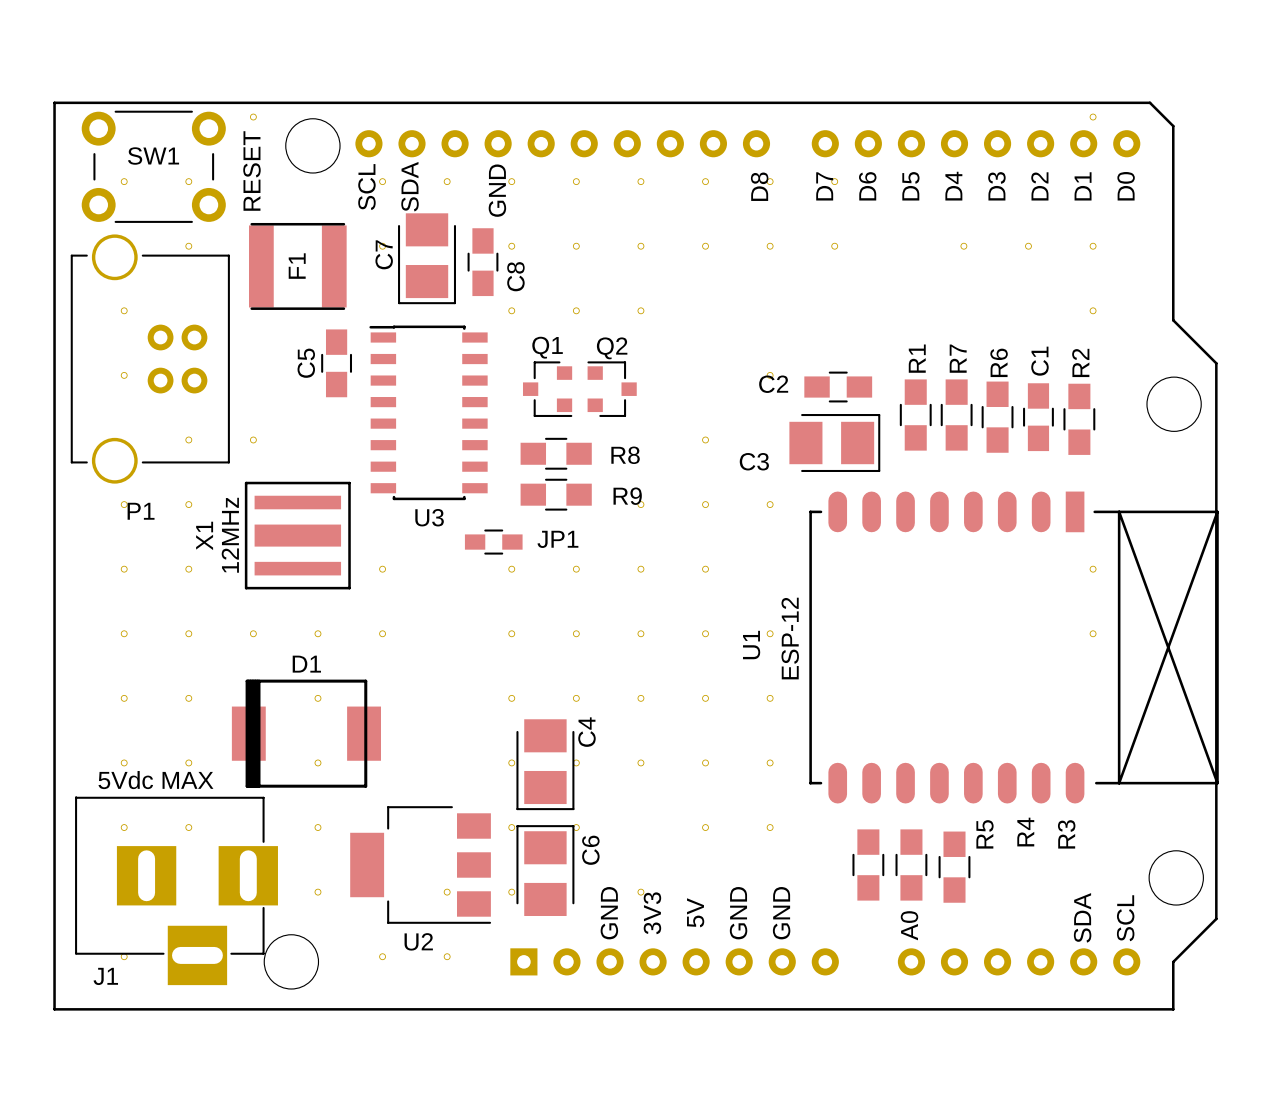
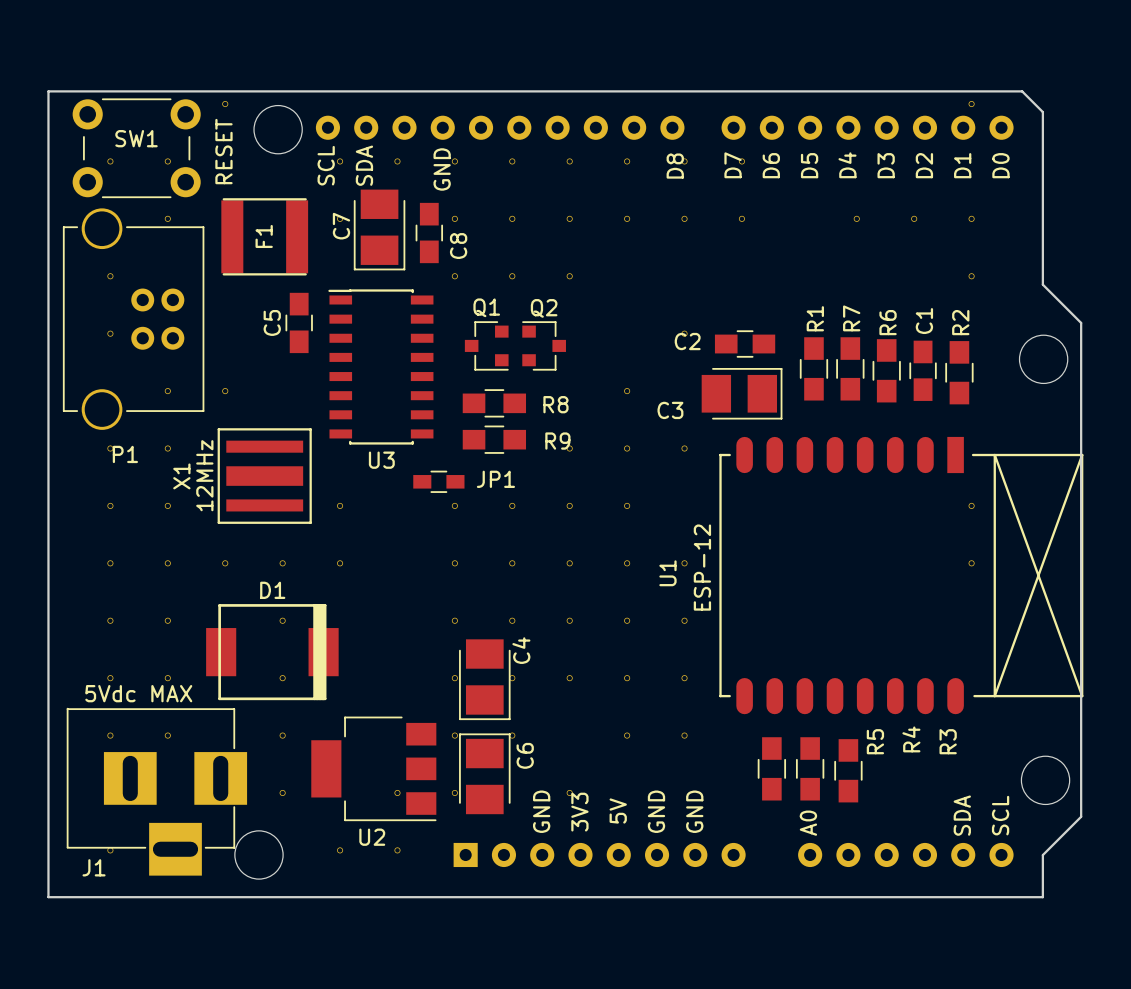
D1 footprint: [231, 679, 381, 788] -> [206, 604, 339, 701]

